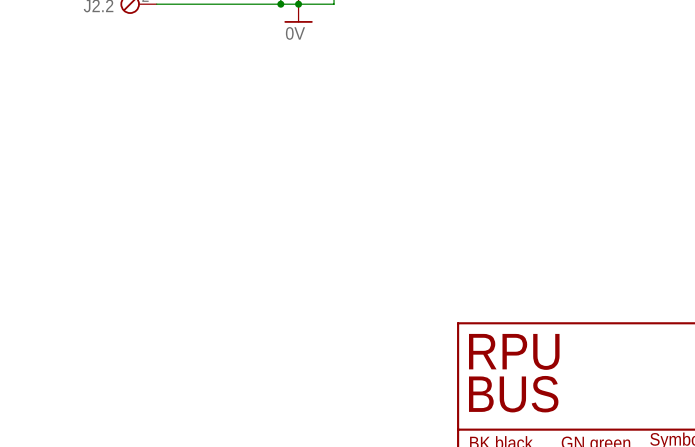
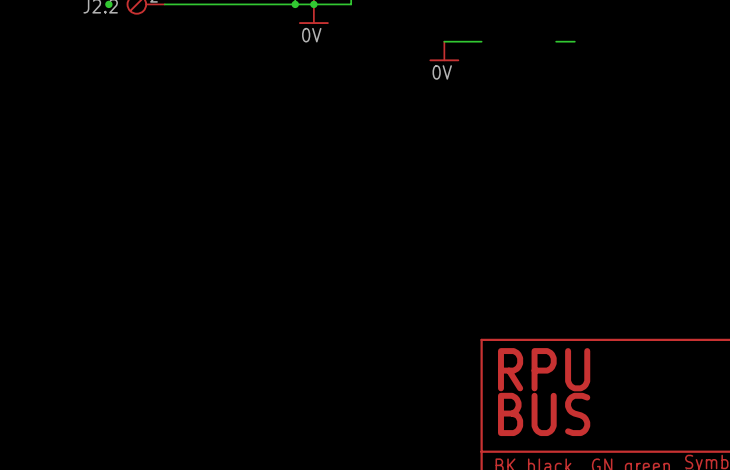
junction: none -> (108, 4)
wire: none -> (444, 41) (481, 41)
wire: none -> (556, 41) (574, 41)
power symbol: none -> 0V (444, 51)

